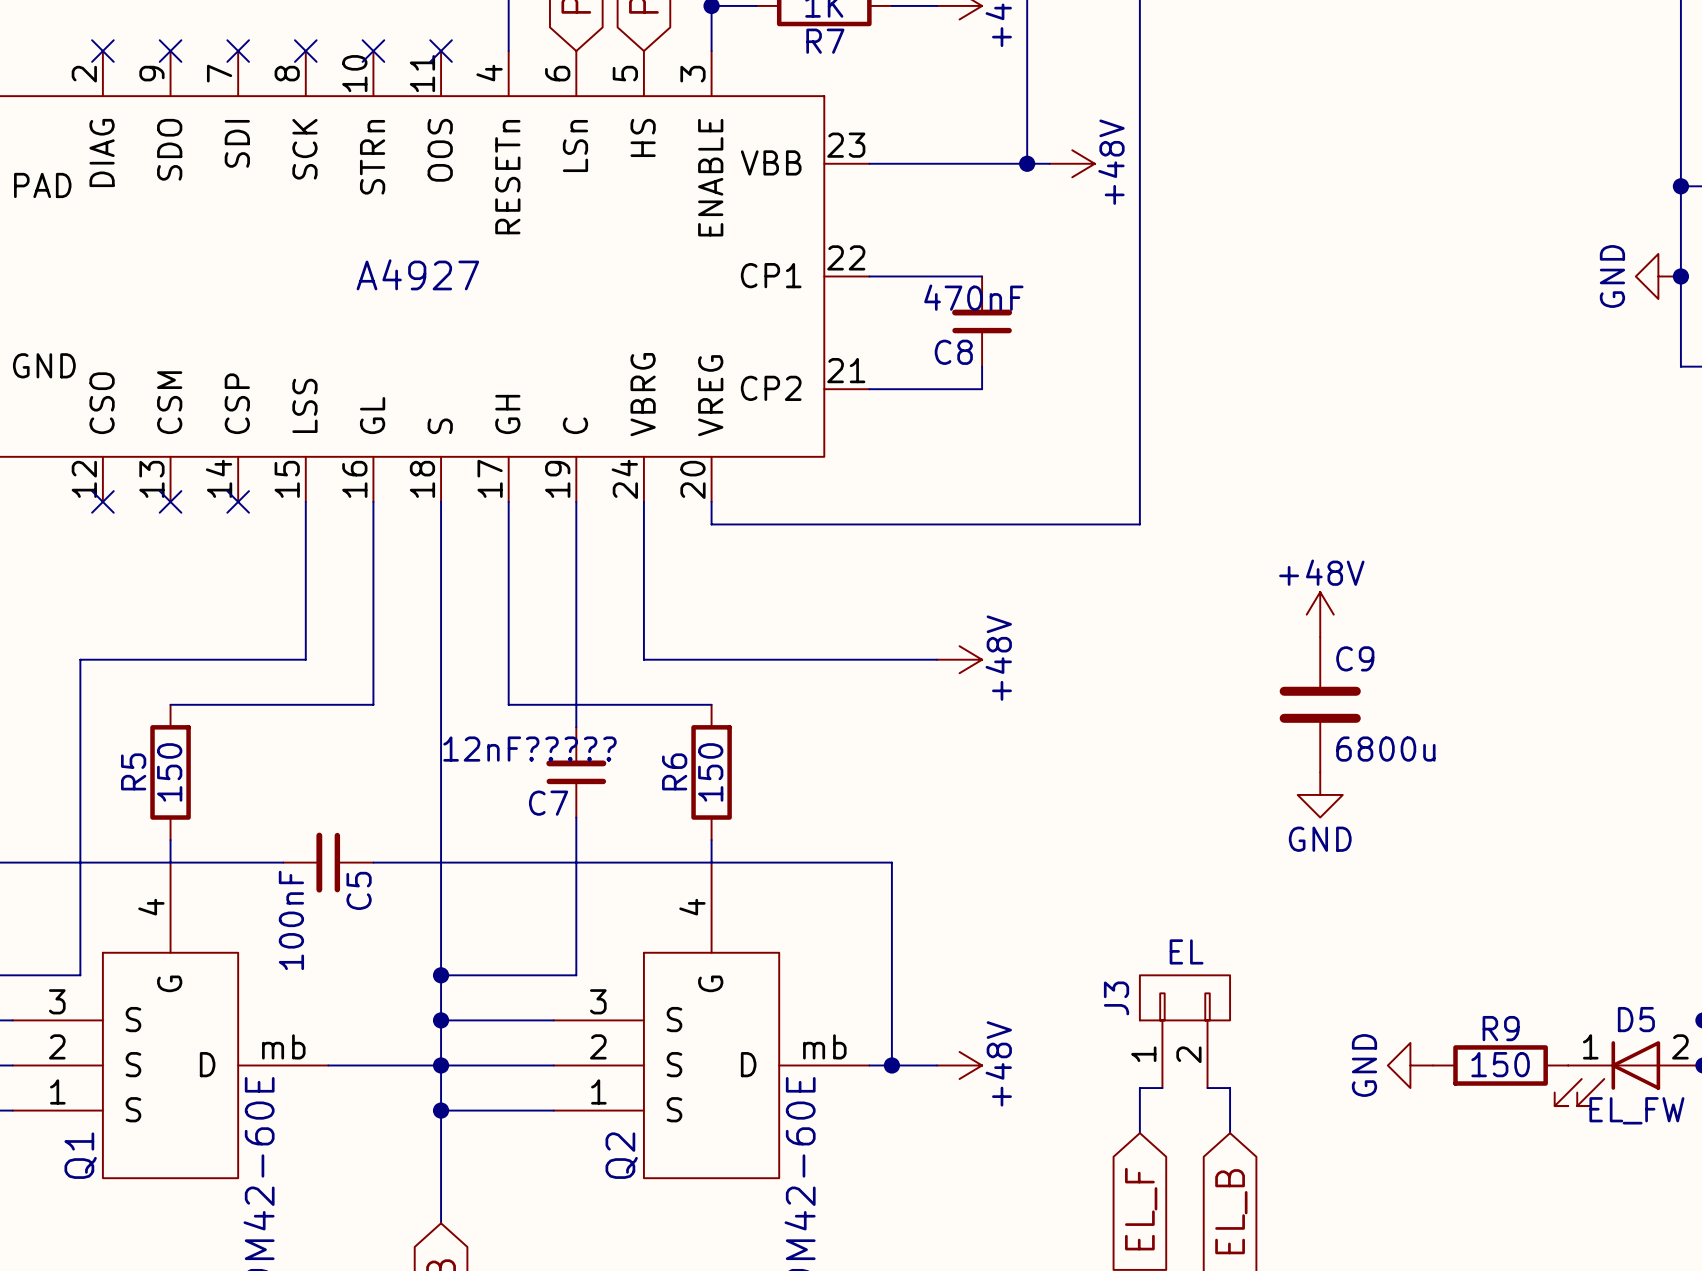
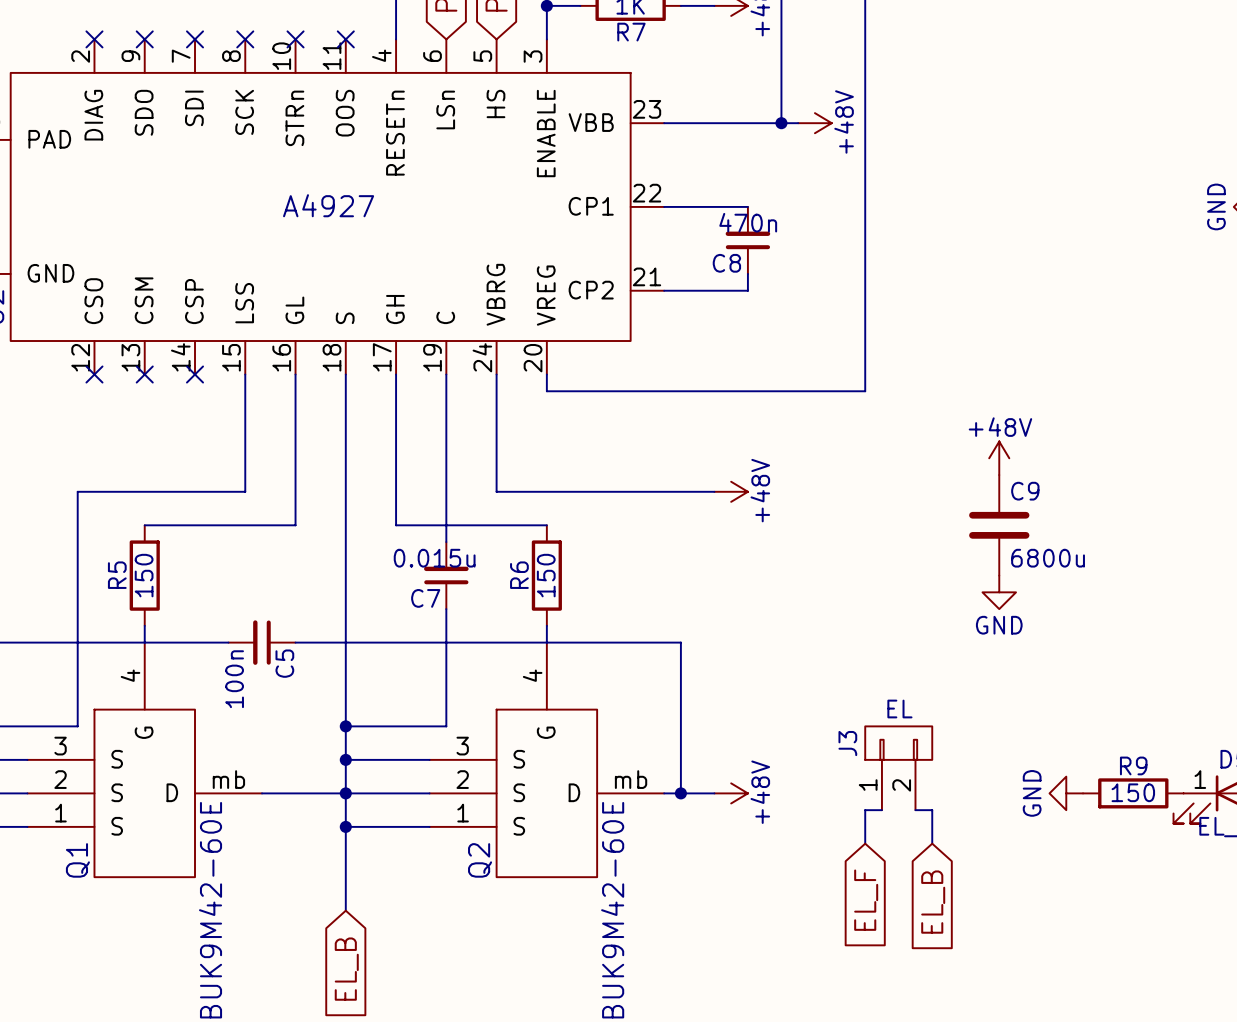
C8 value: 470nF (973, 297) -> 470n (748, 222)
C7 value: 12nF????? (529, 749) -> 0.015u (434, 558)
C5 value: 100nF (291, 920) -> 100n (234, 679)

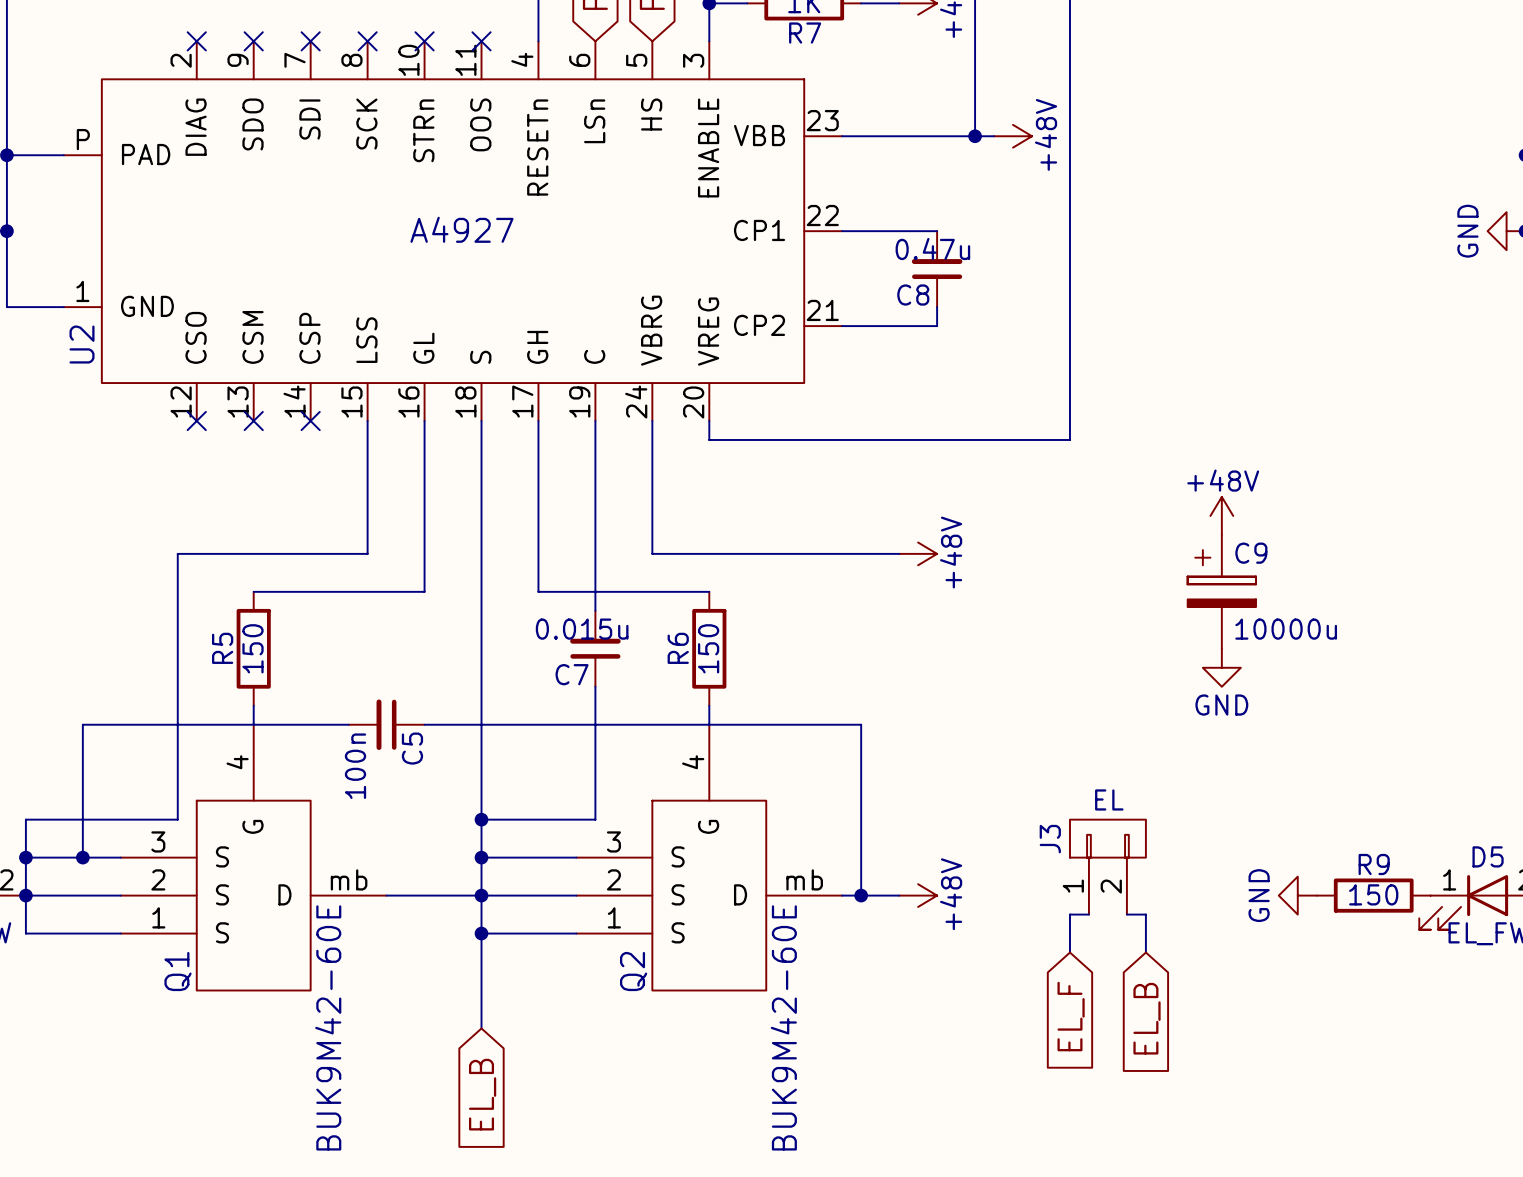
C8 value: 470n (748, 222) -> 0.47u (932, 248)
C9 symbol: [969, 475, 1030, 576] -> [1187, 534, 1257, 649]
C9 value: 6800u (1048, 558) -> 10000u (1286, 629)

